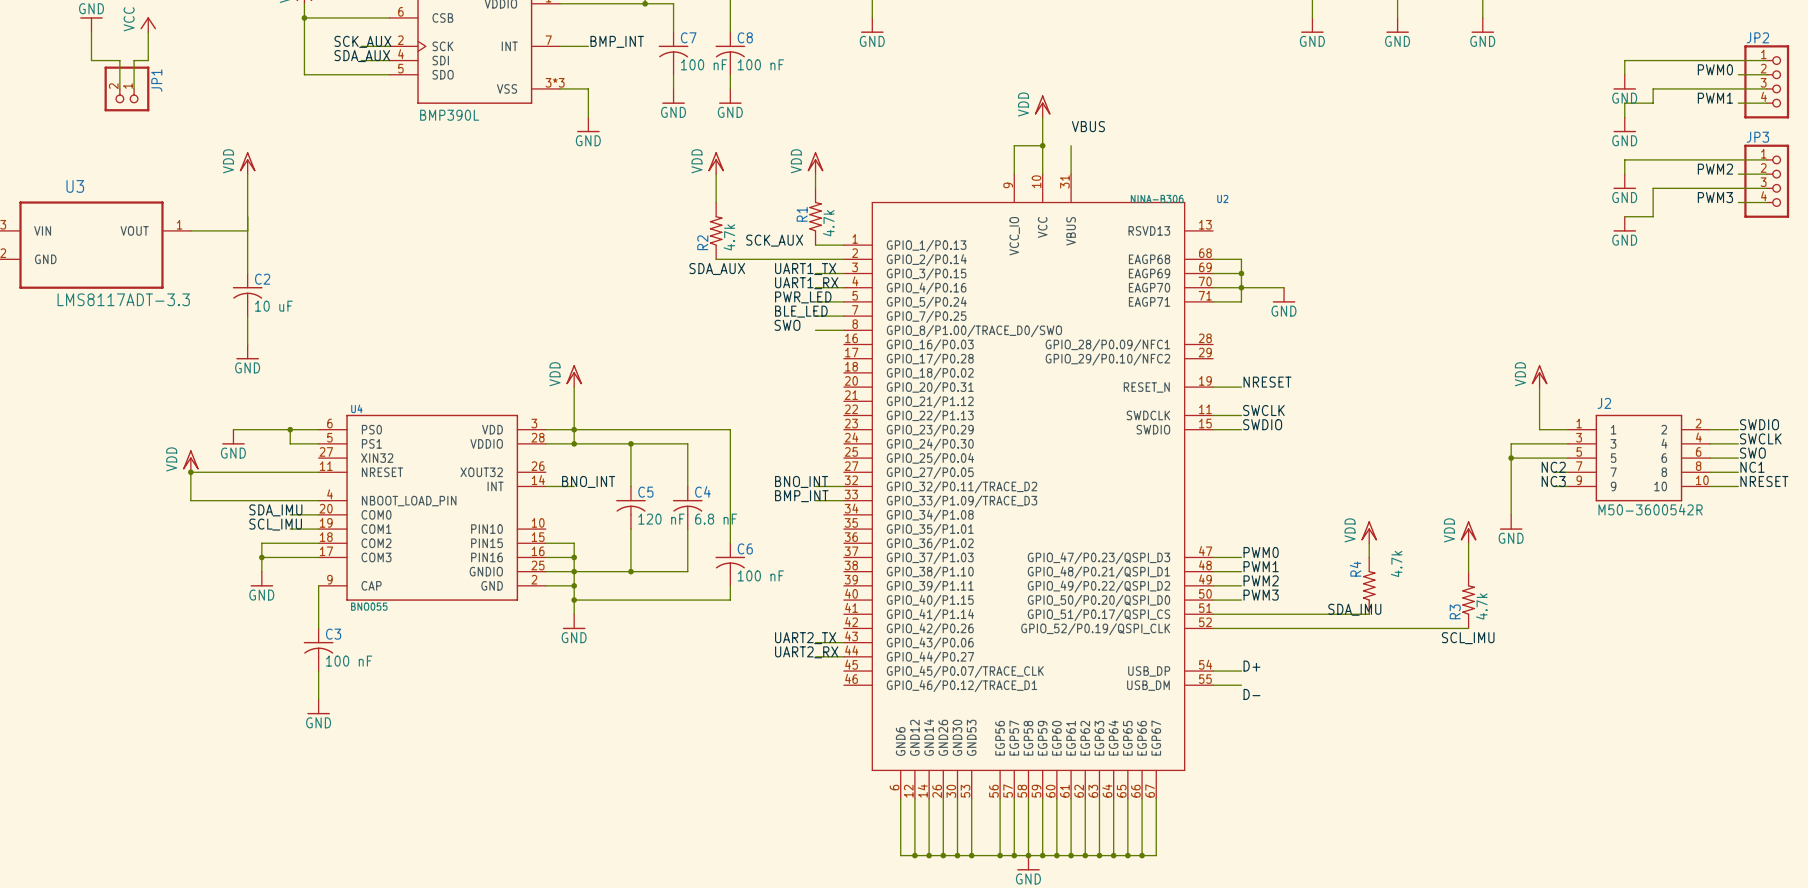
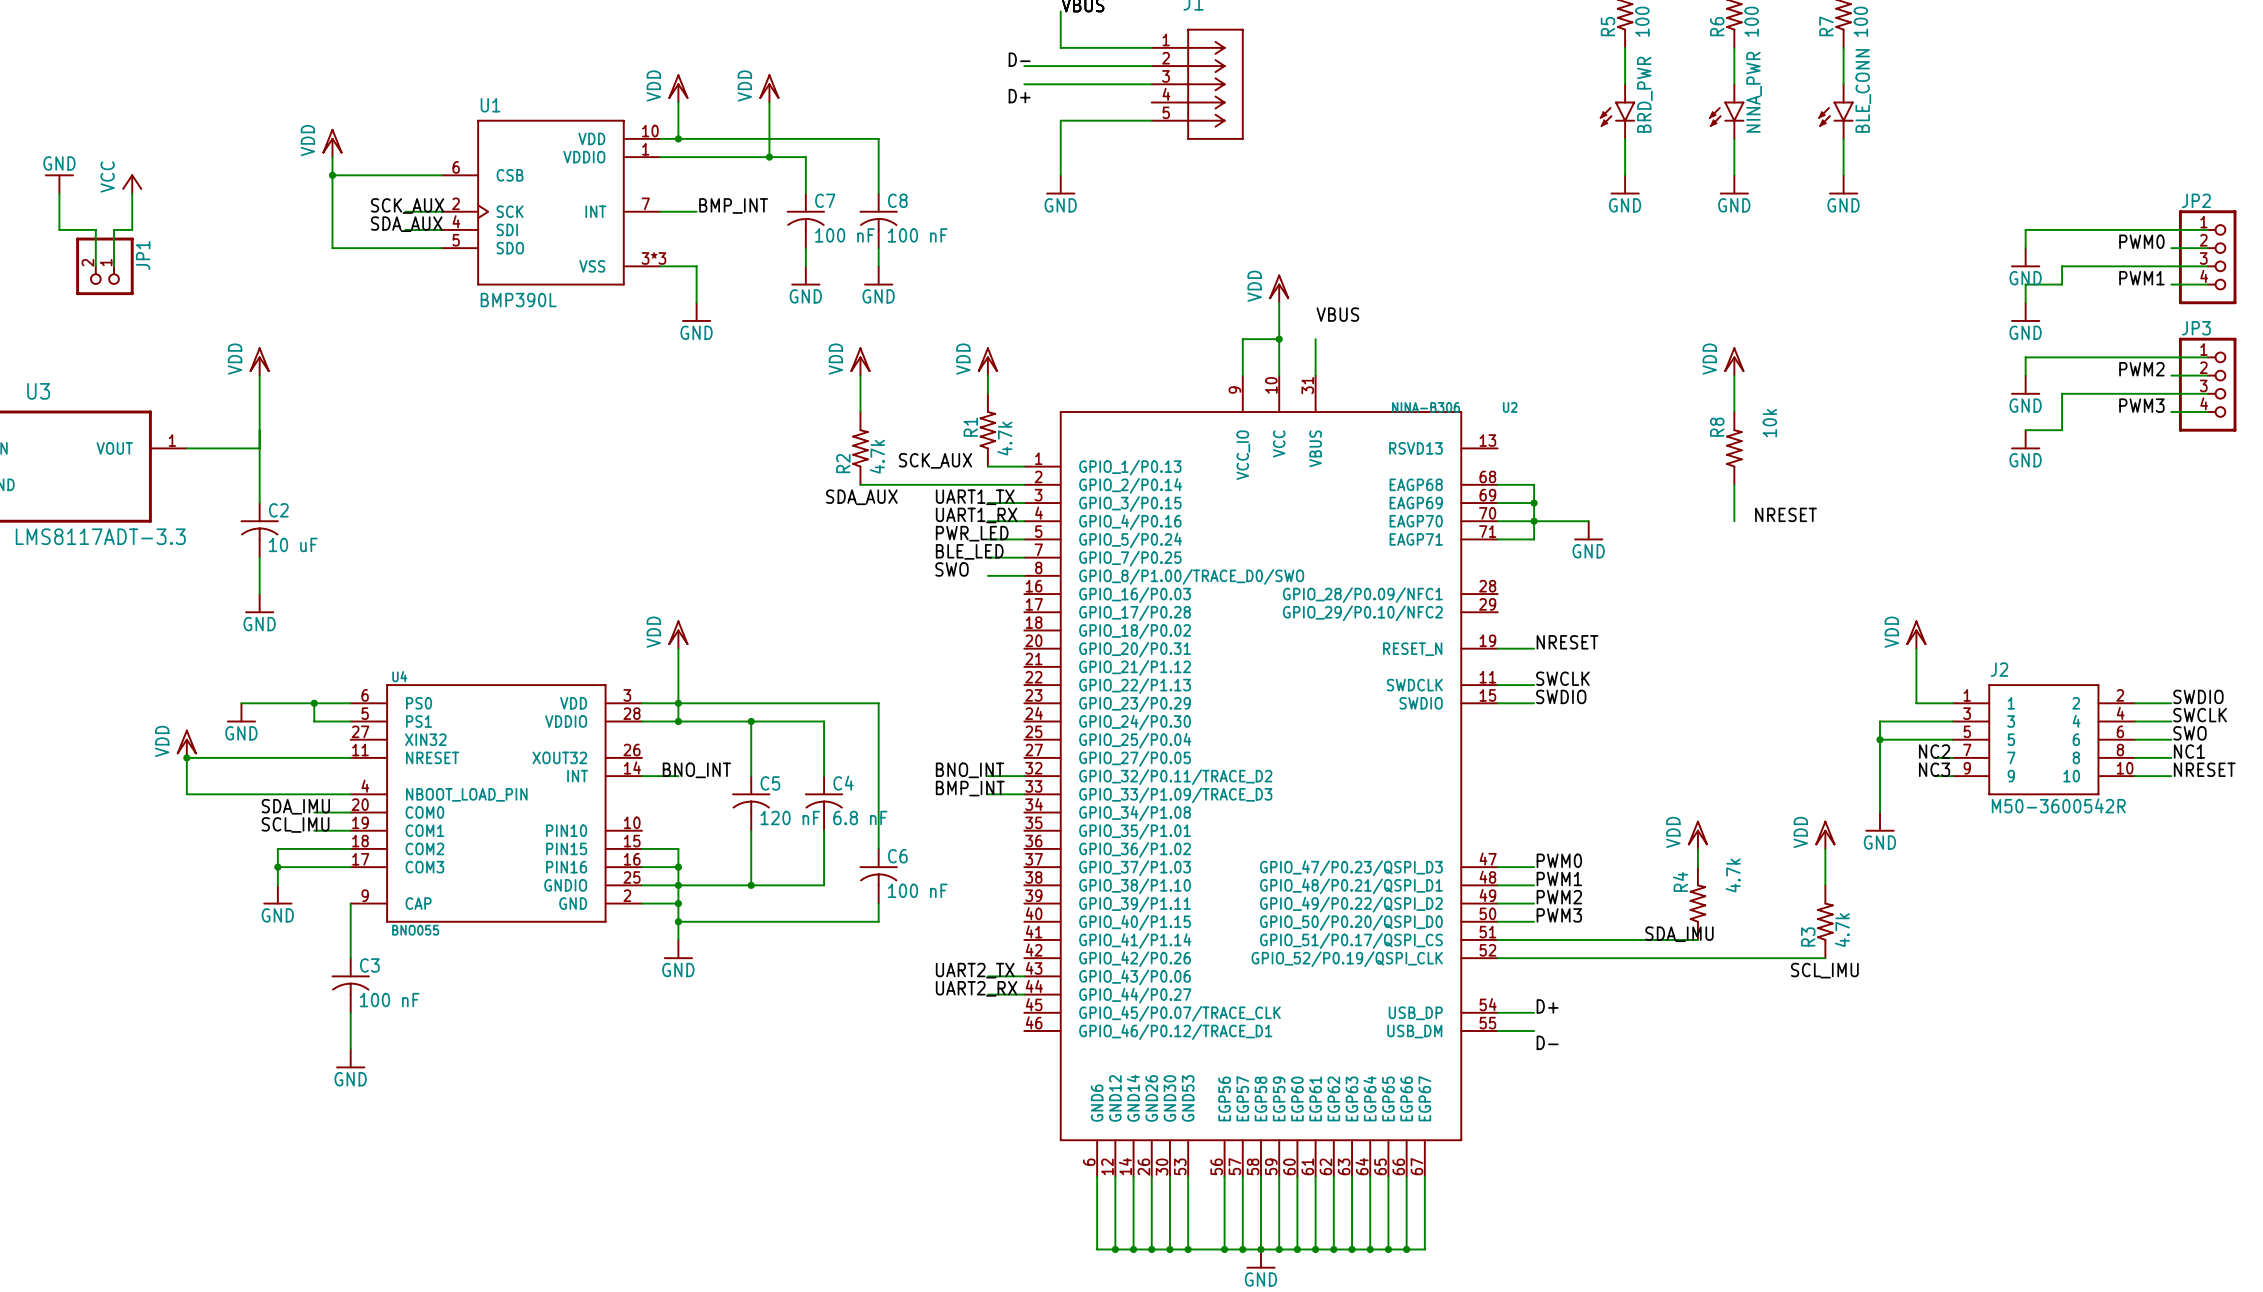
power symbol: none -> VDD (1734, 361)
wire: none -> (1734, 375) (1734, 412)
R8: none -> 10k (1734, 448)
wire: none -> (1734, 484) (1734, 521)
label: none -> NRESET (1785, 514)

